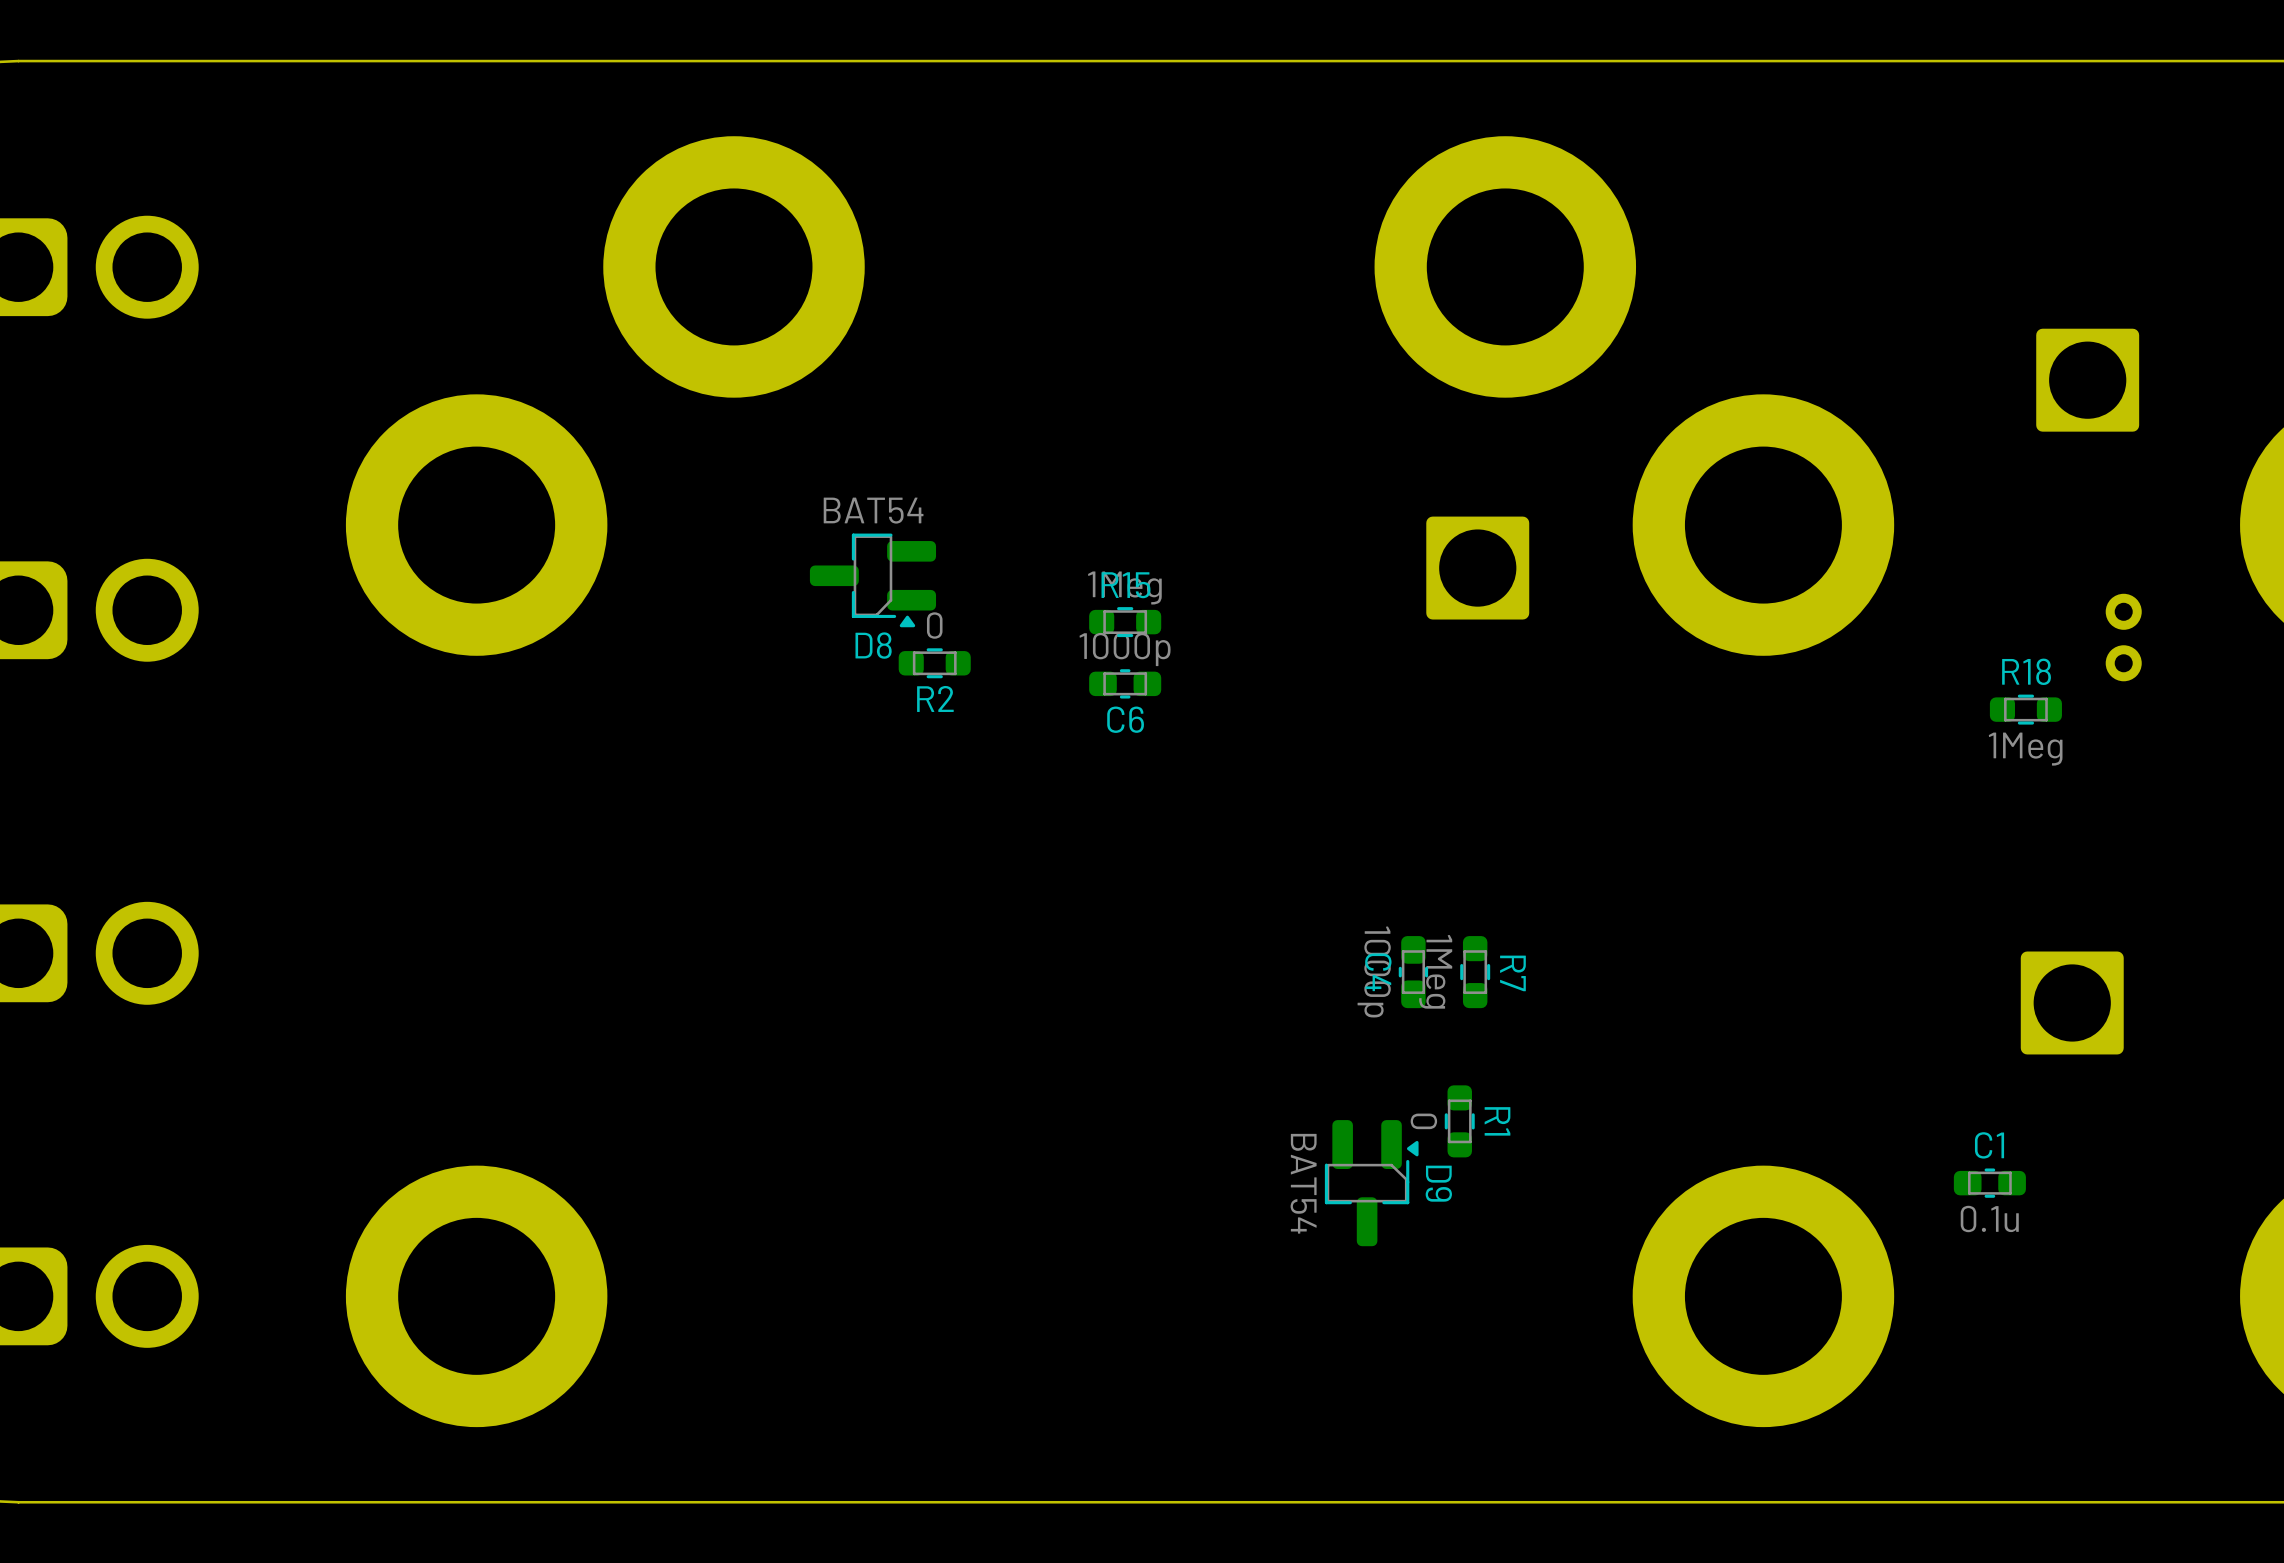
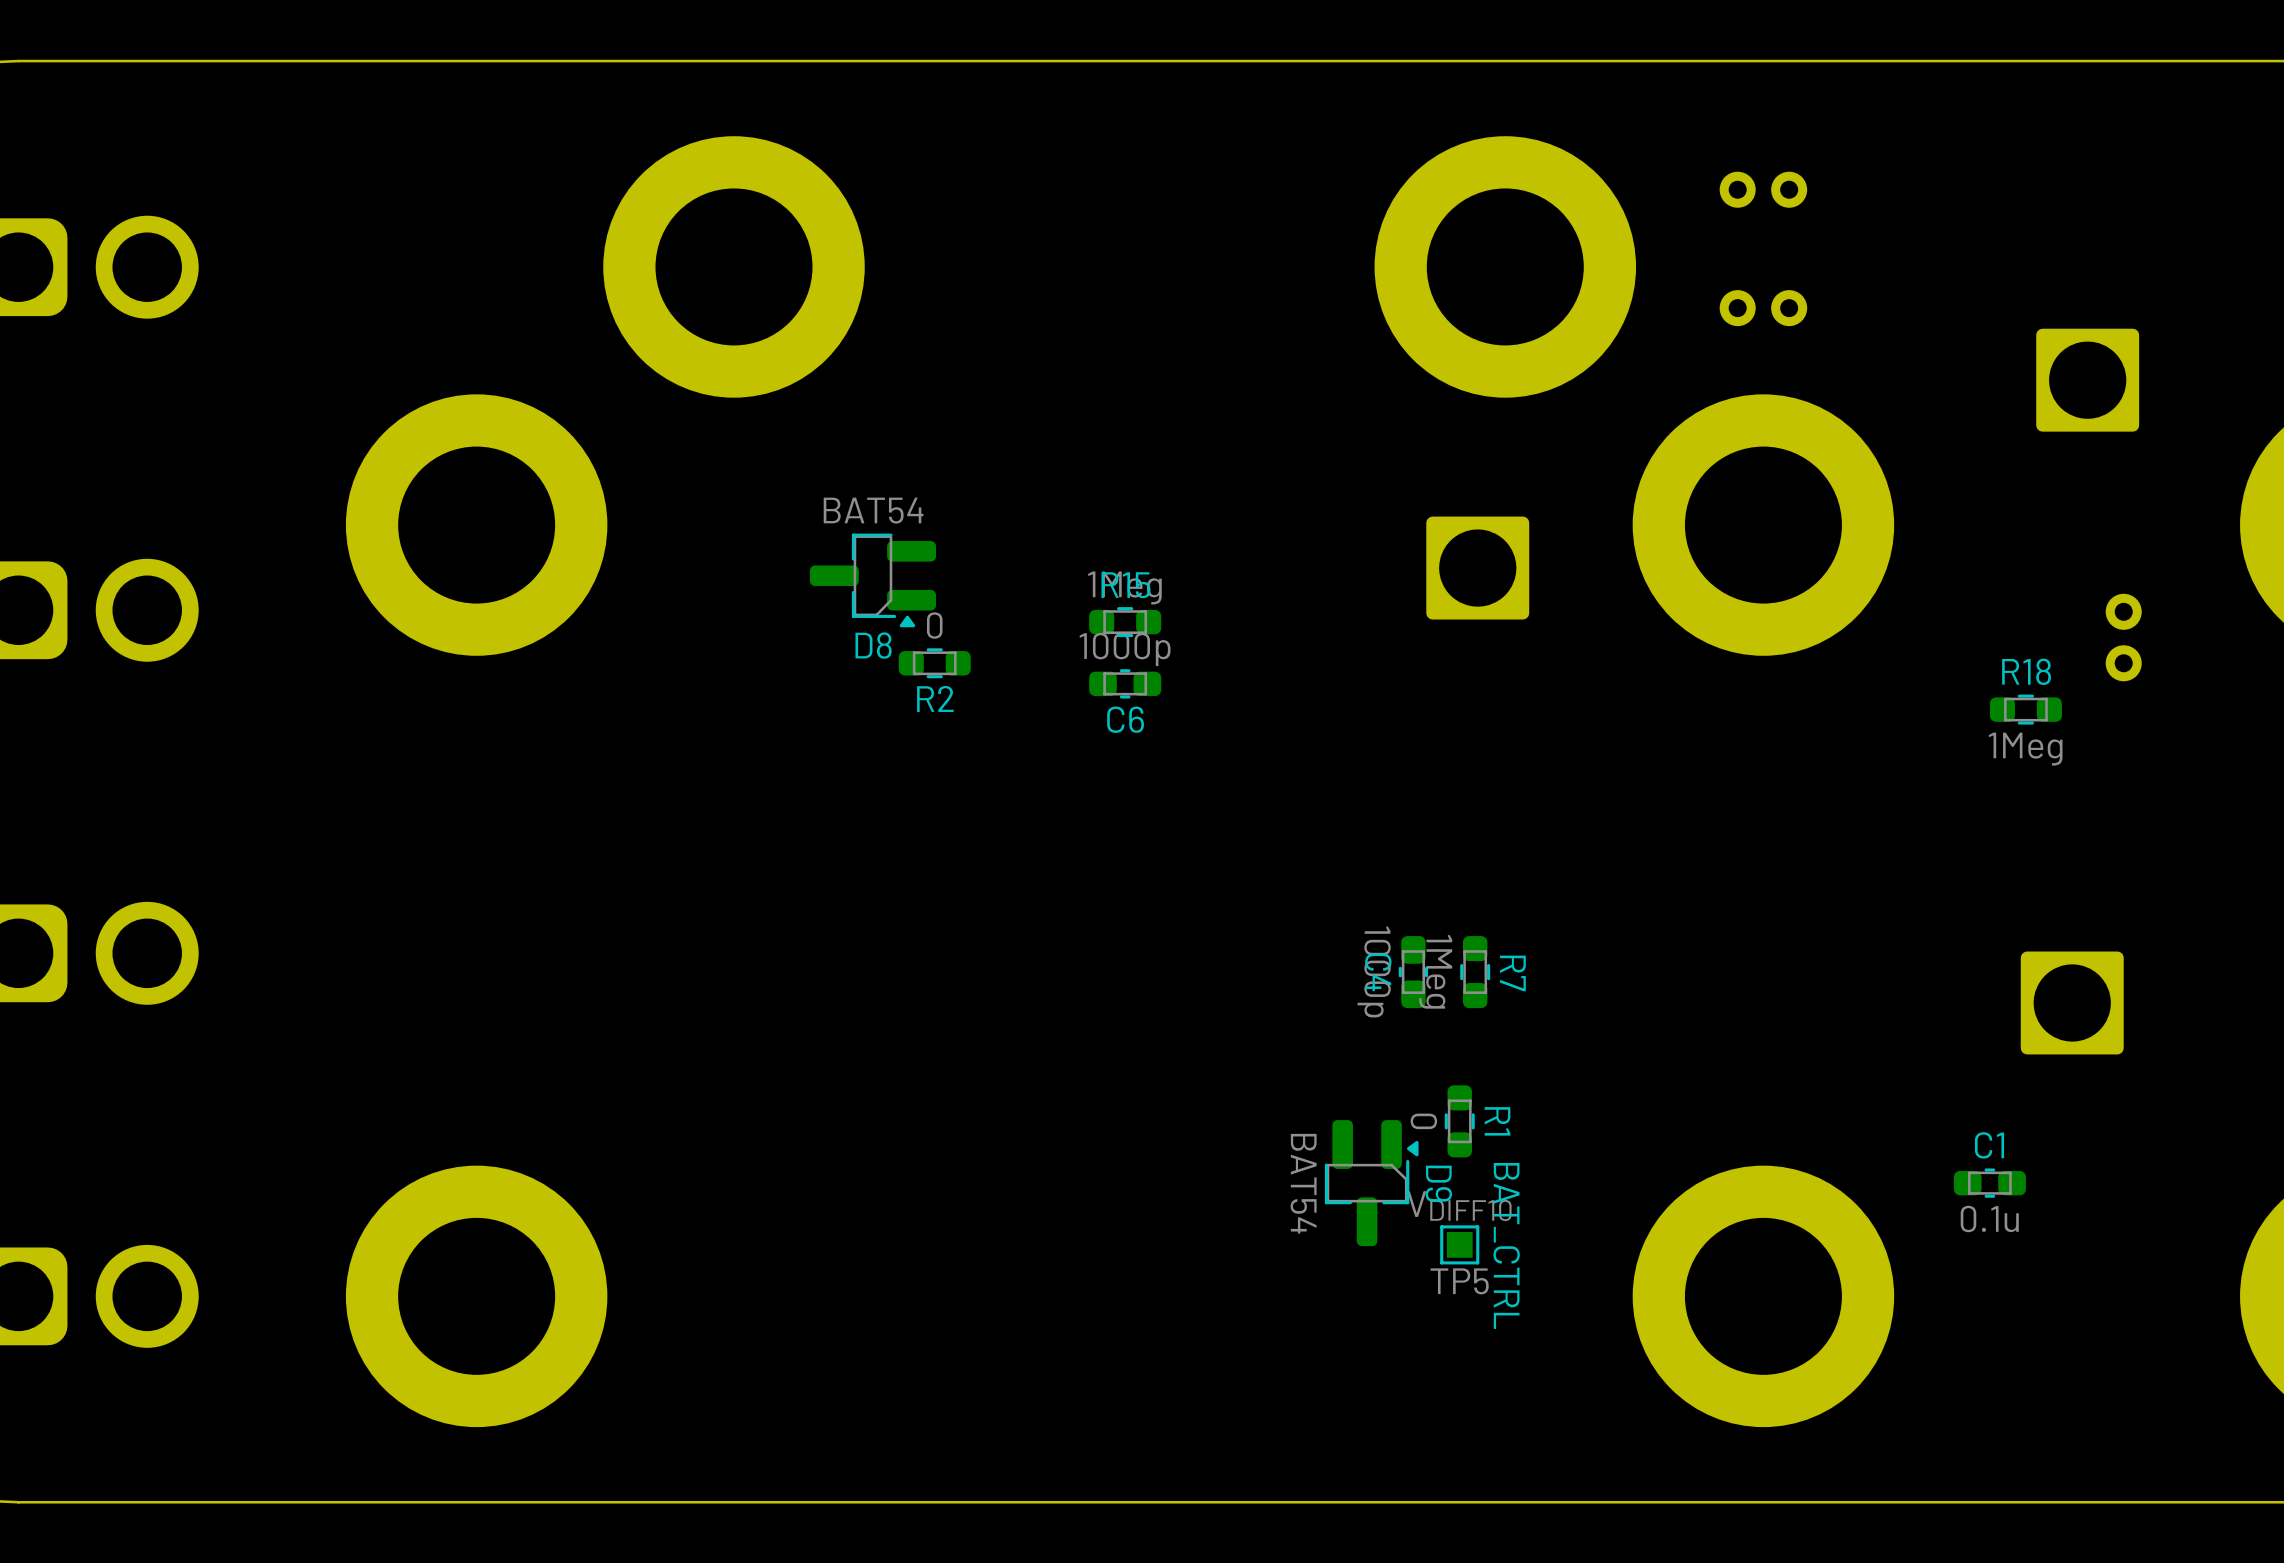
part: none -> (1763, 189)
part: none -> (1763, 308)
TP5: none -> VDIFF10 (1459, 1244)
text: none -> BAT_CTRL (1506, 1245)

